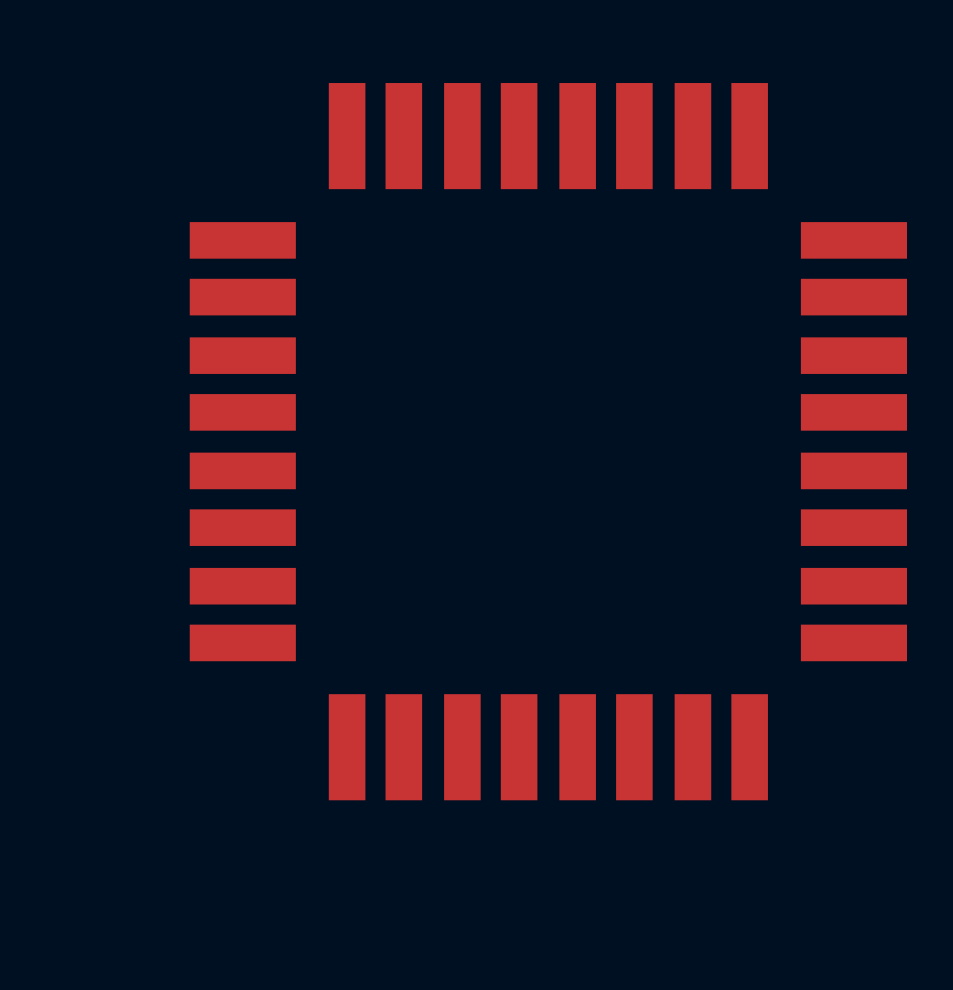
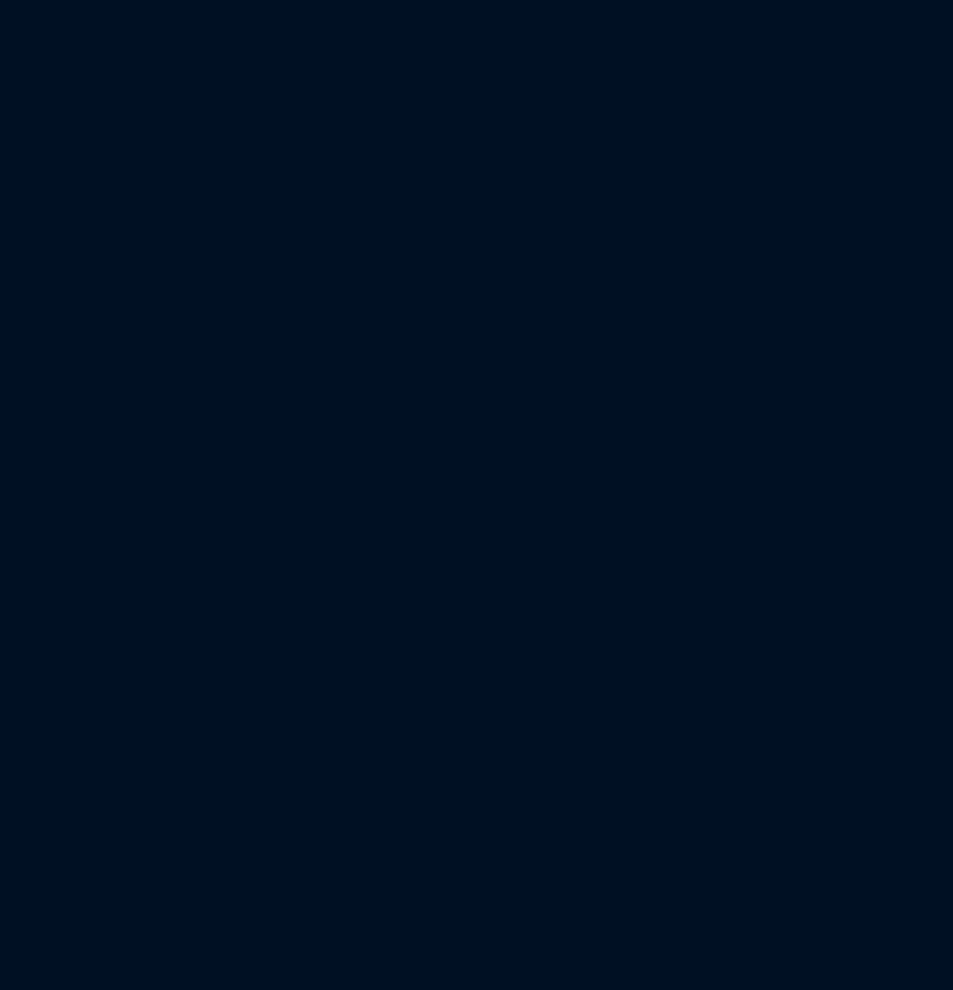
part: (548, 441) -> none

